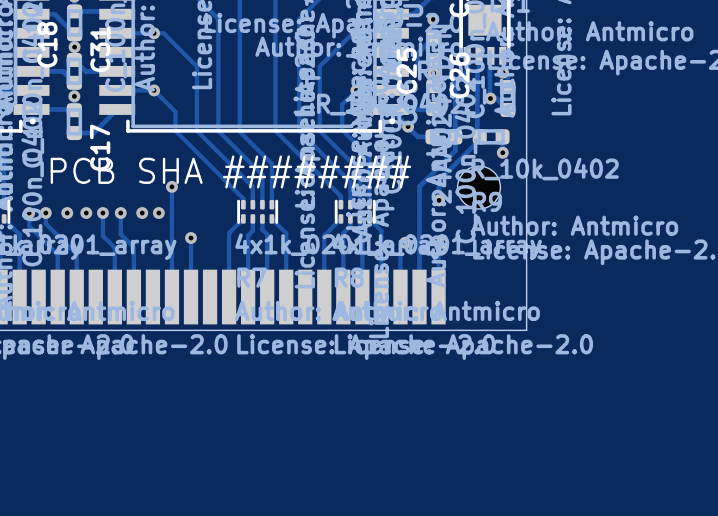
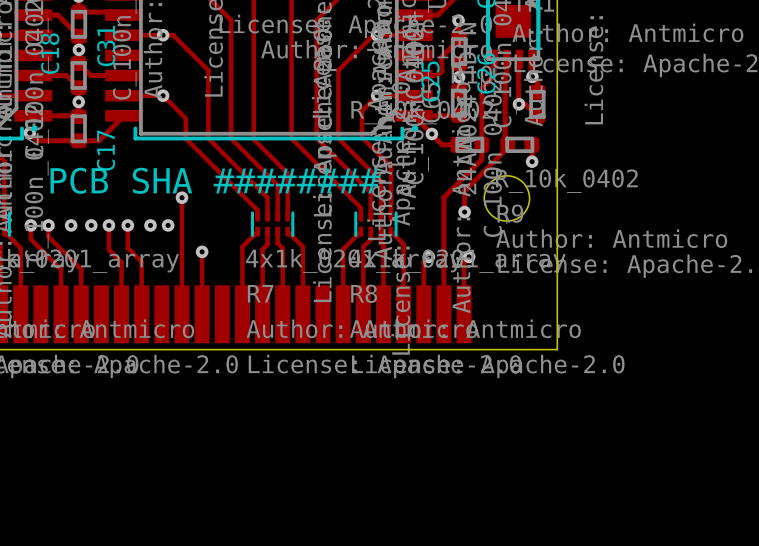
track: none -> (29, 132) (37, 140) (78, 140)
via: none -> (29, 132)

